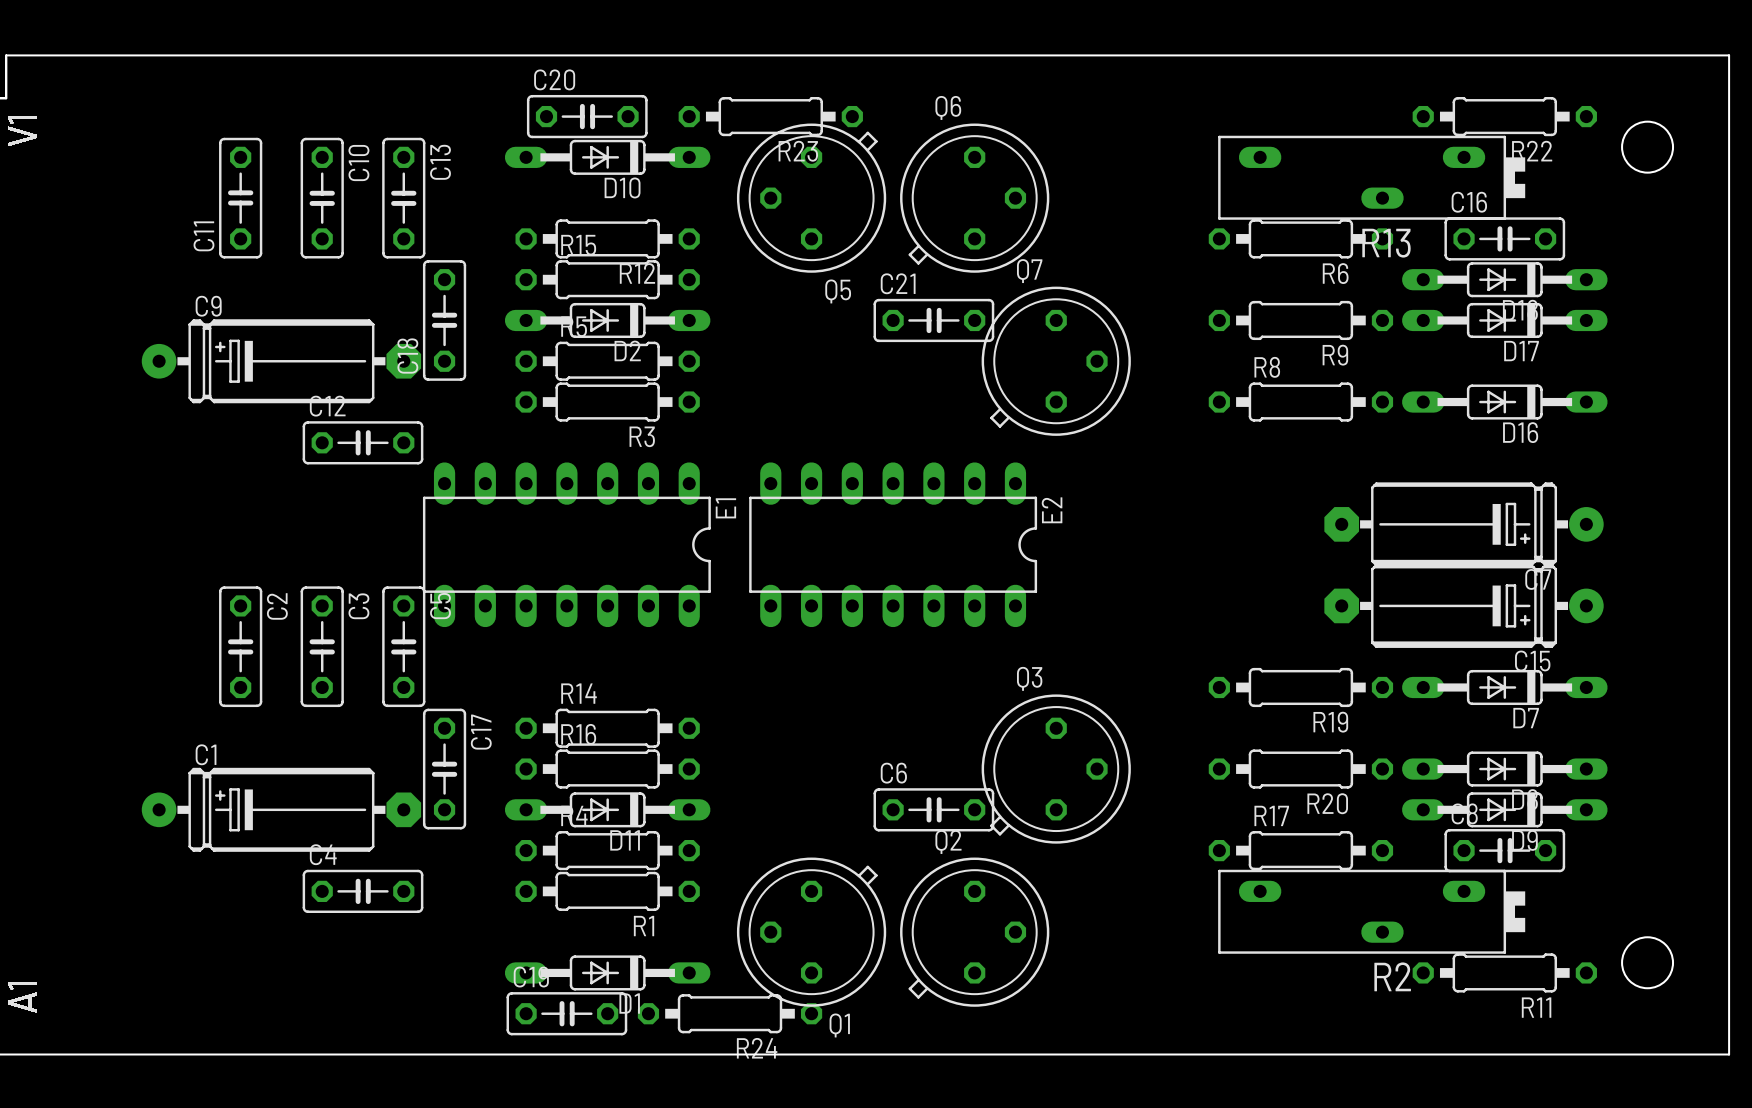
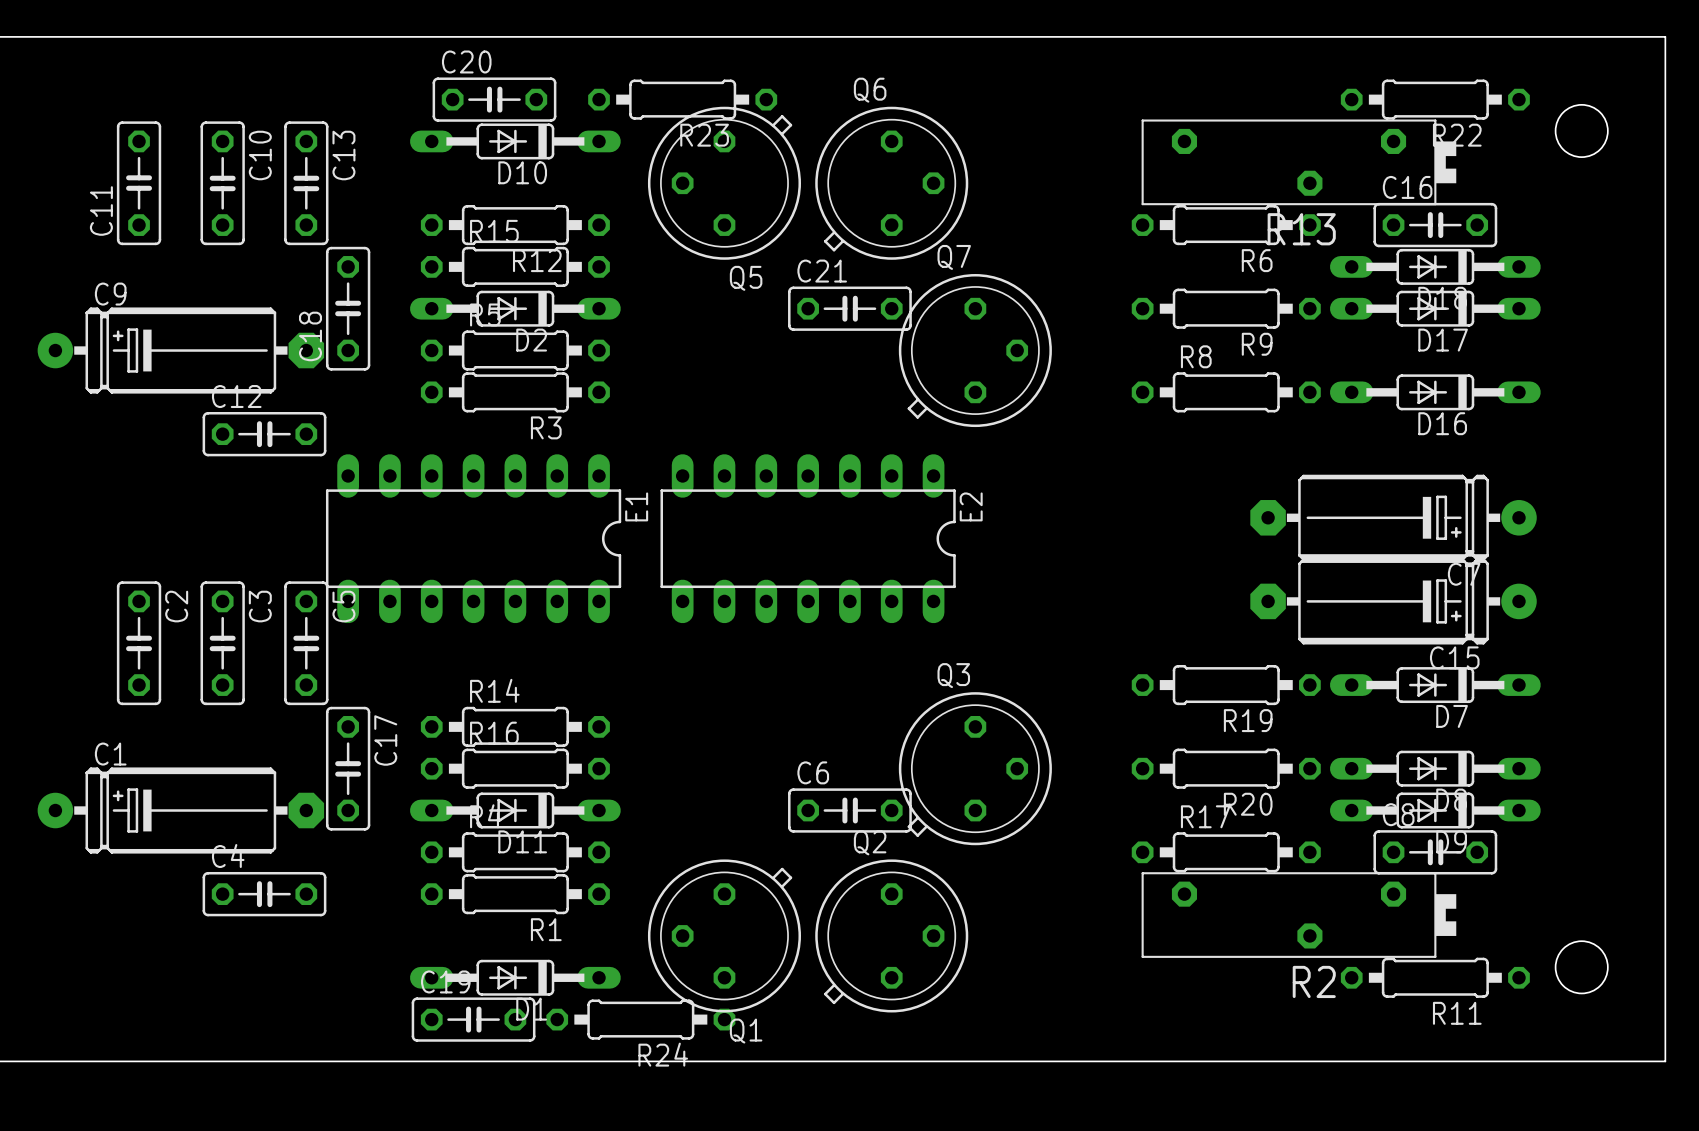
R13 footprint: [1218, 135, 1526, 220] -> [1141, 119, 1457, 206]
R2 footprint: [1218, 869, 1526, 954] -> [1141, 872, 1457, 958]

